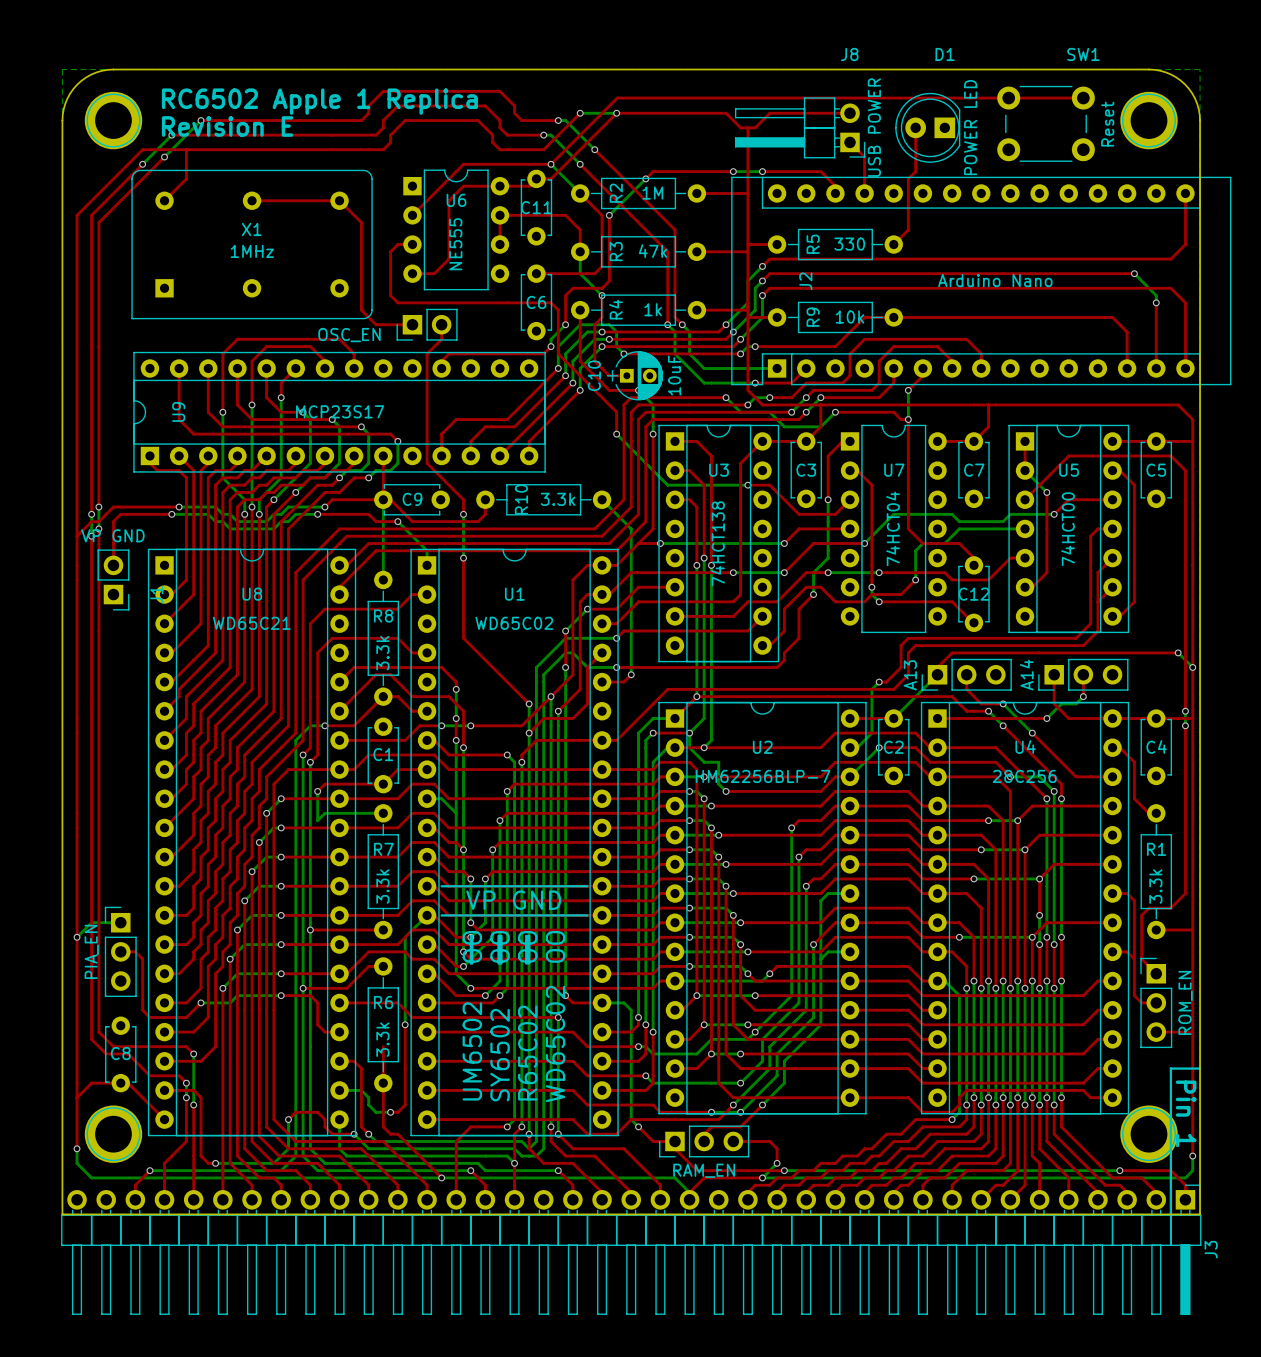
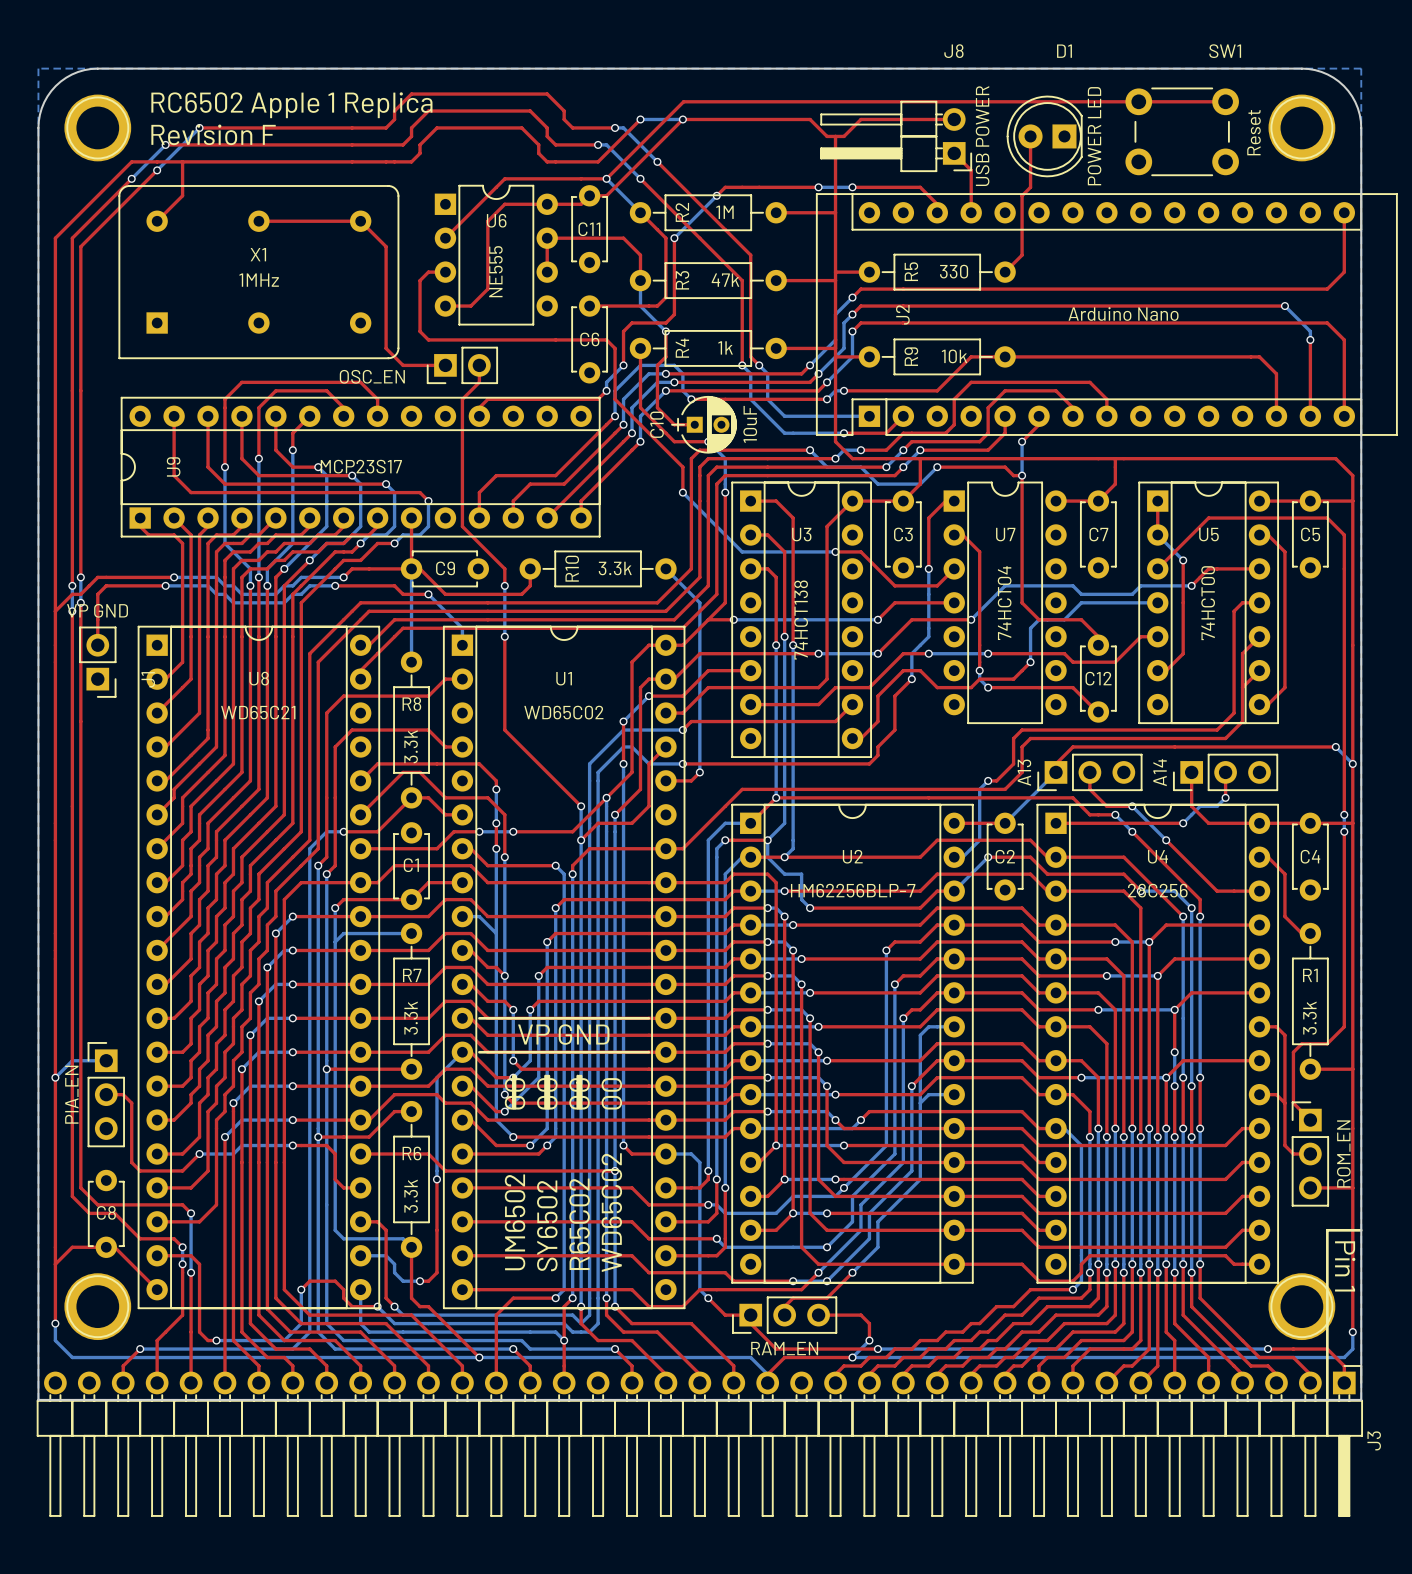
text: Revision E (227, 126) -> Revision F (213, 134)
bottom track: none -> (335, 942) (335, 1230) (343, 1238) (403, 1238) (411, 1247)
top track: (383, 1046) (383, 1083) -> none

